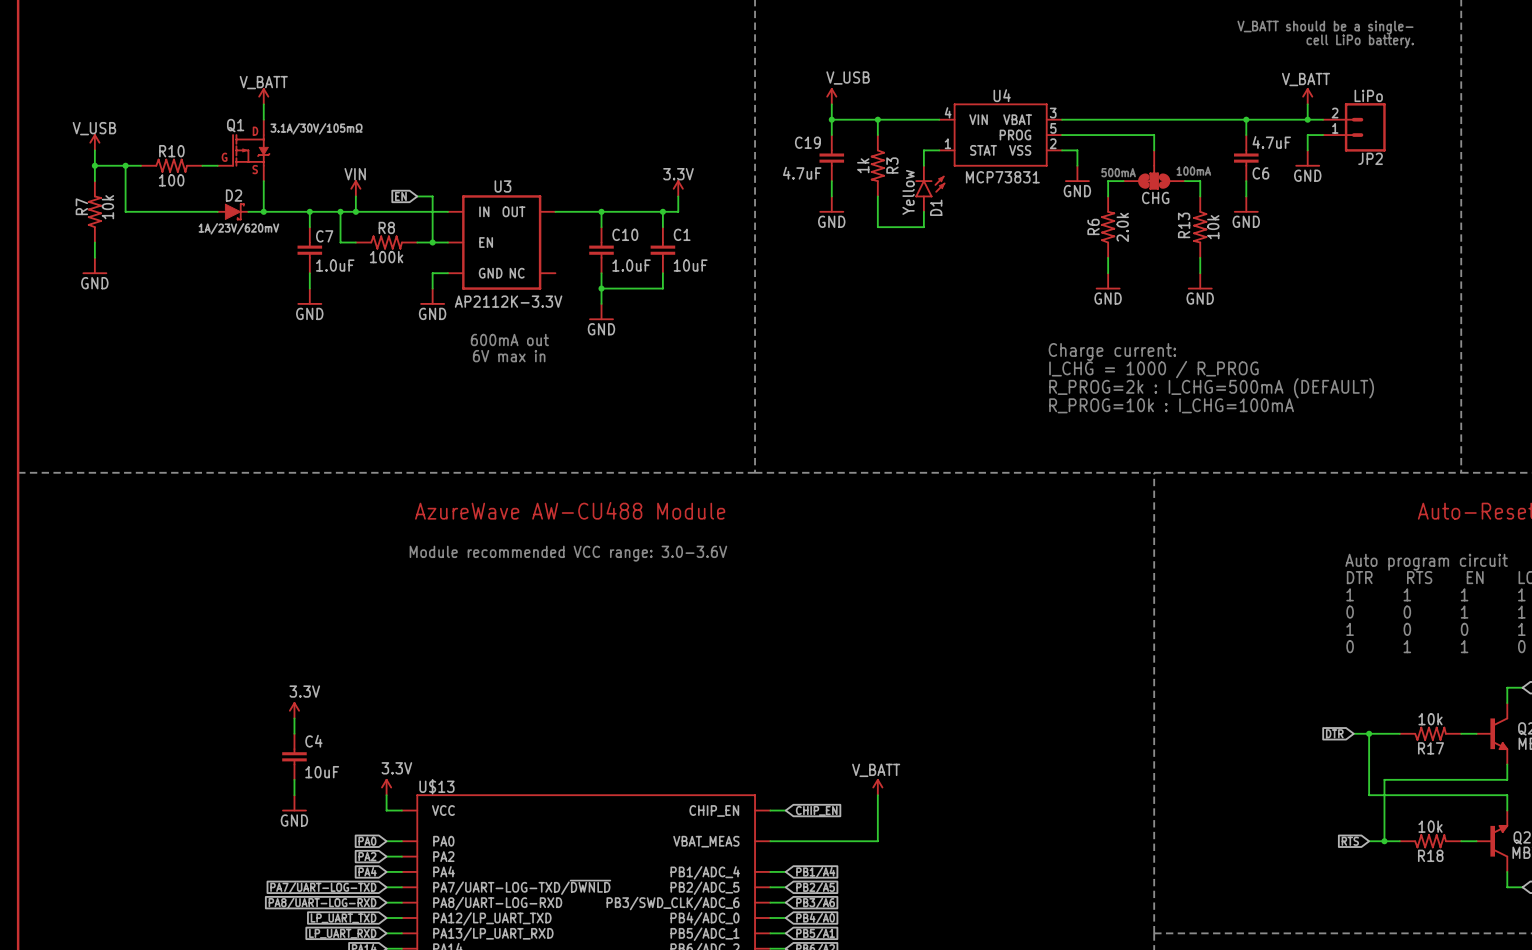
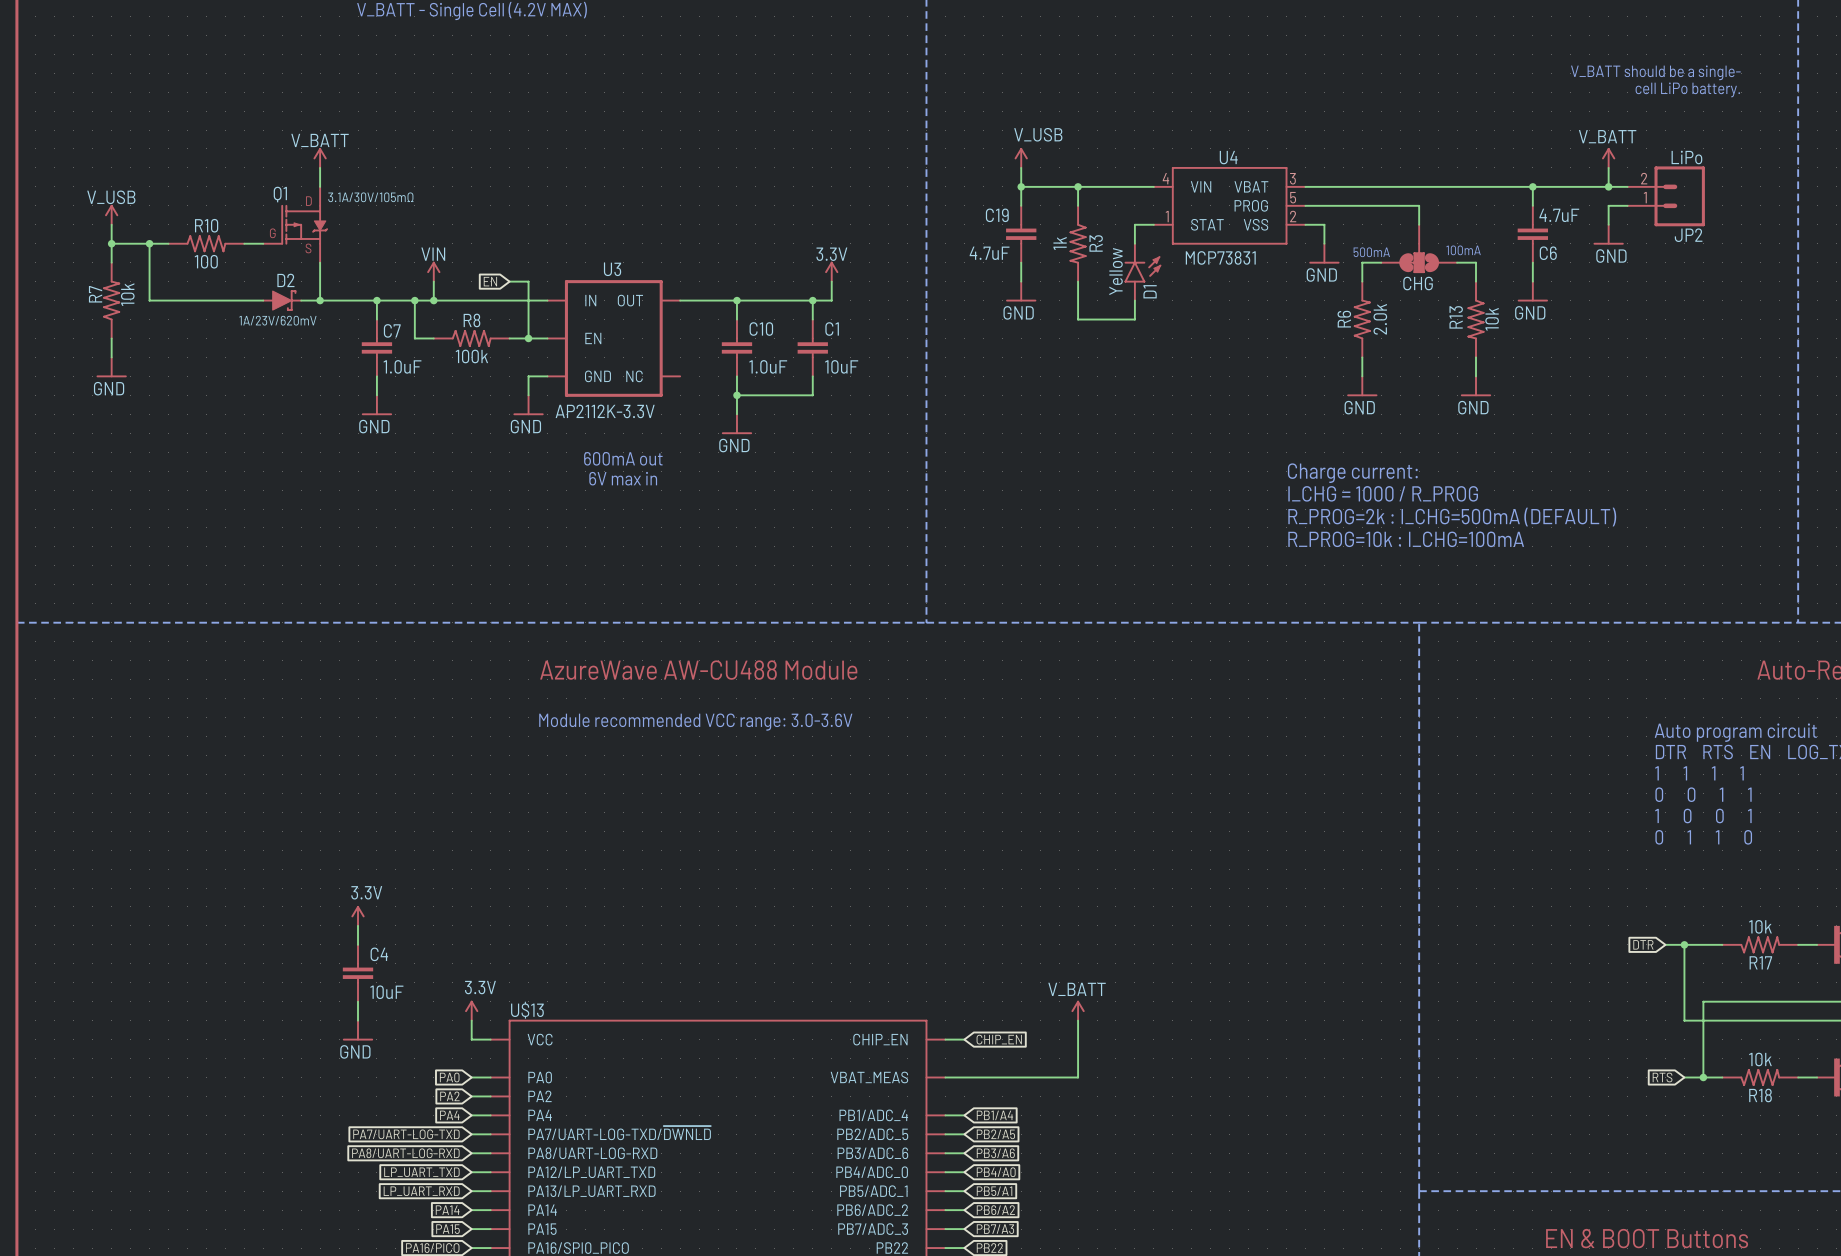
U$13 pin name: PB3/SWD_CLK/ADC_6 (673, 903) -> PB3/ADC_6 (872, 1153)

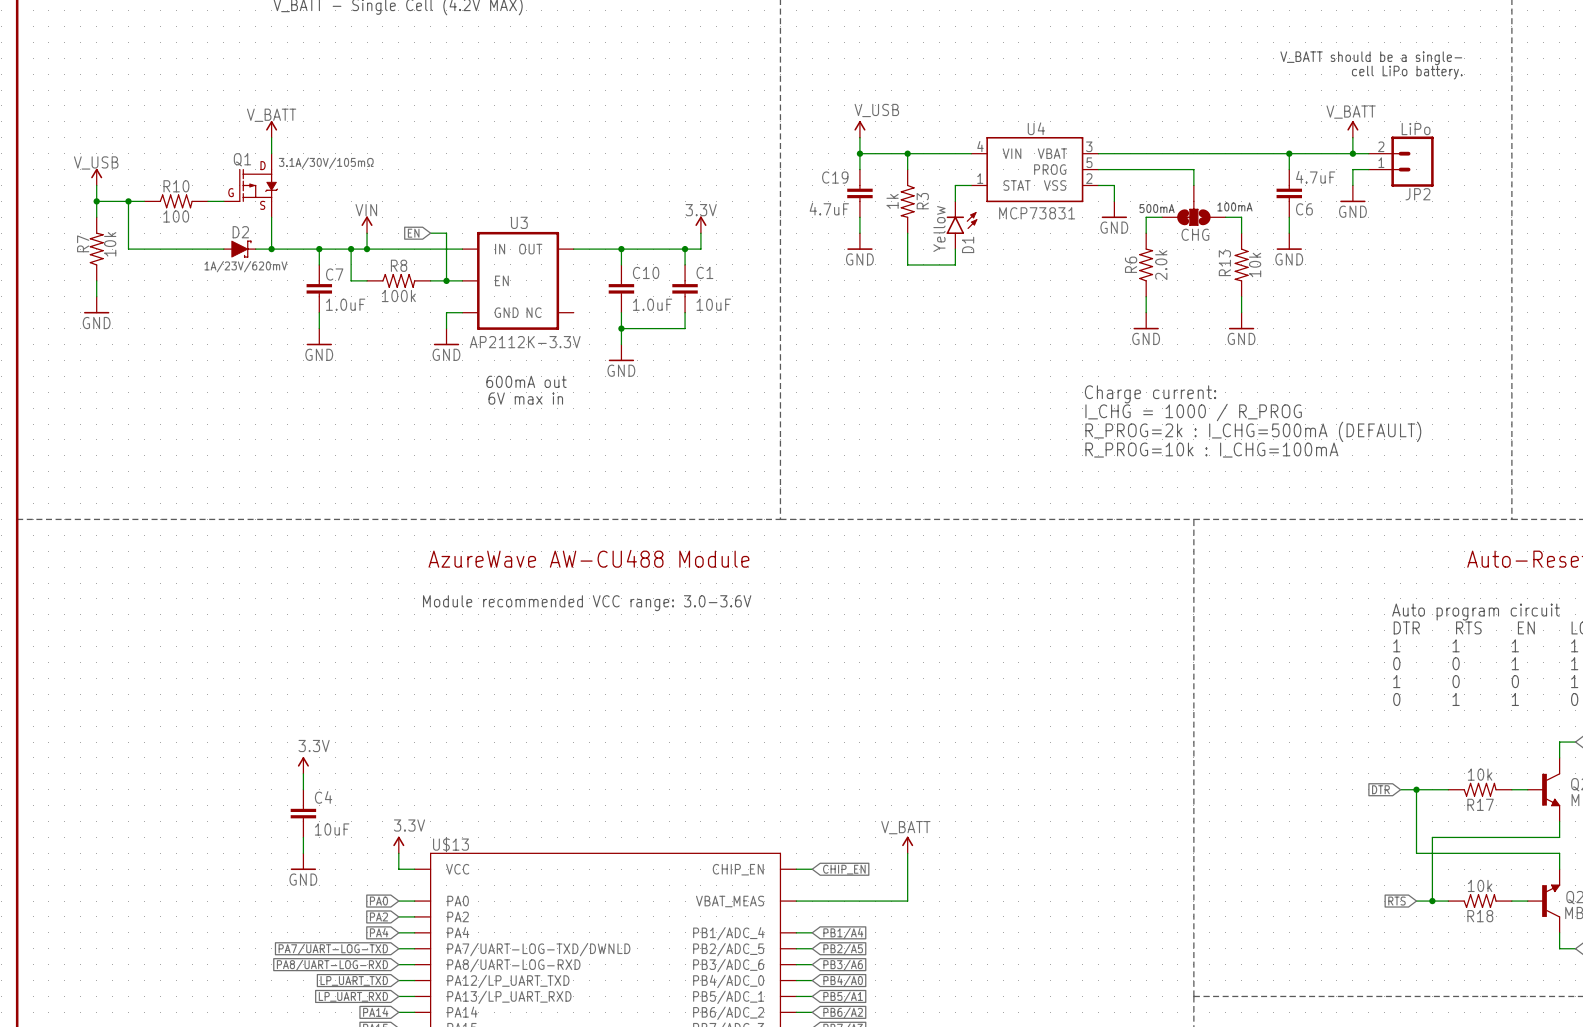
U$13 pin name: PA7/UART-LOG-TXD/~{DWNLD} (619, 1133) -> PA7/UART-LOG-TXD/DWNLD (538, 949)

